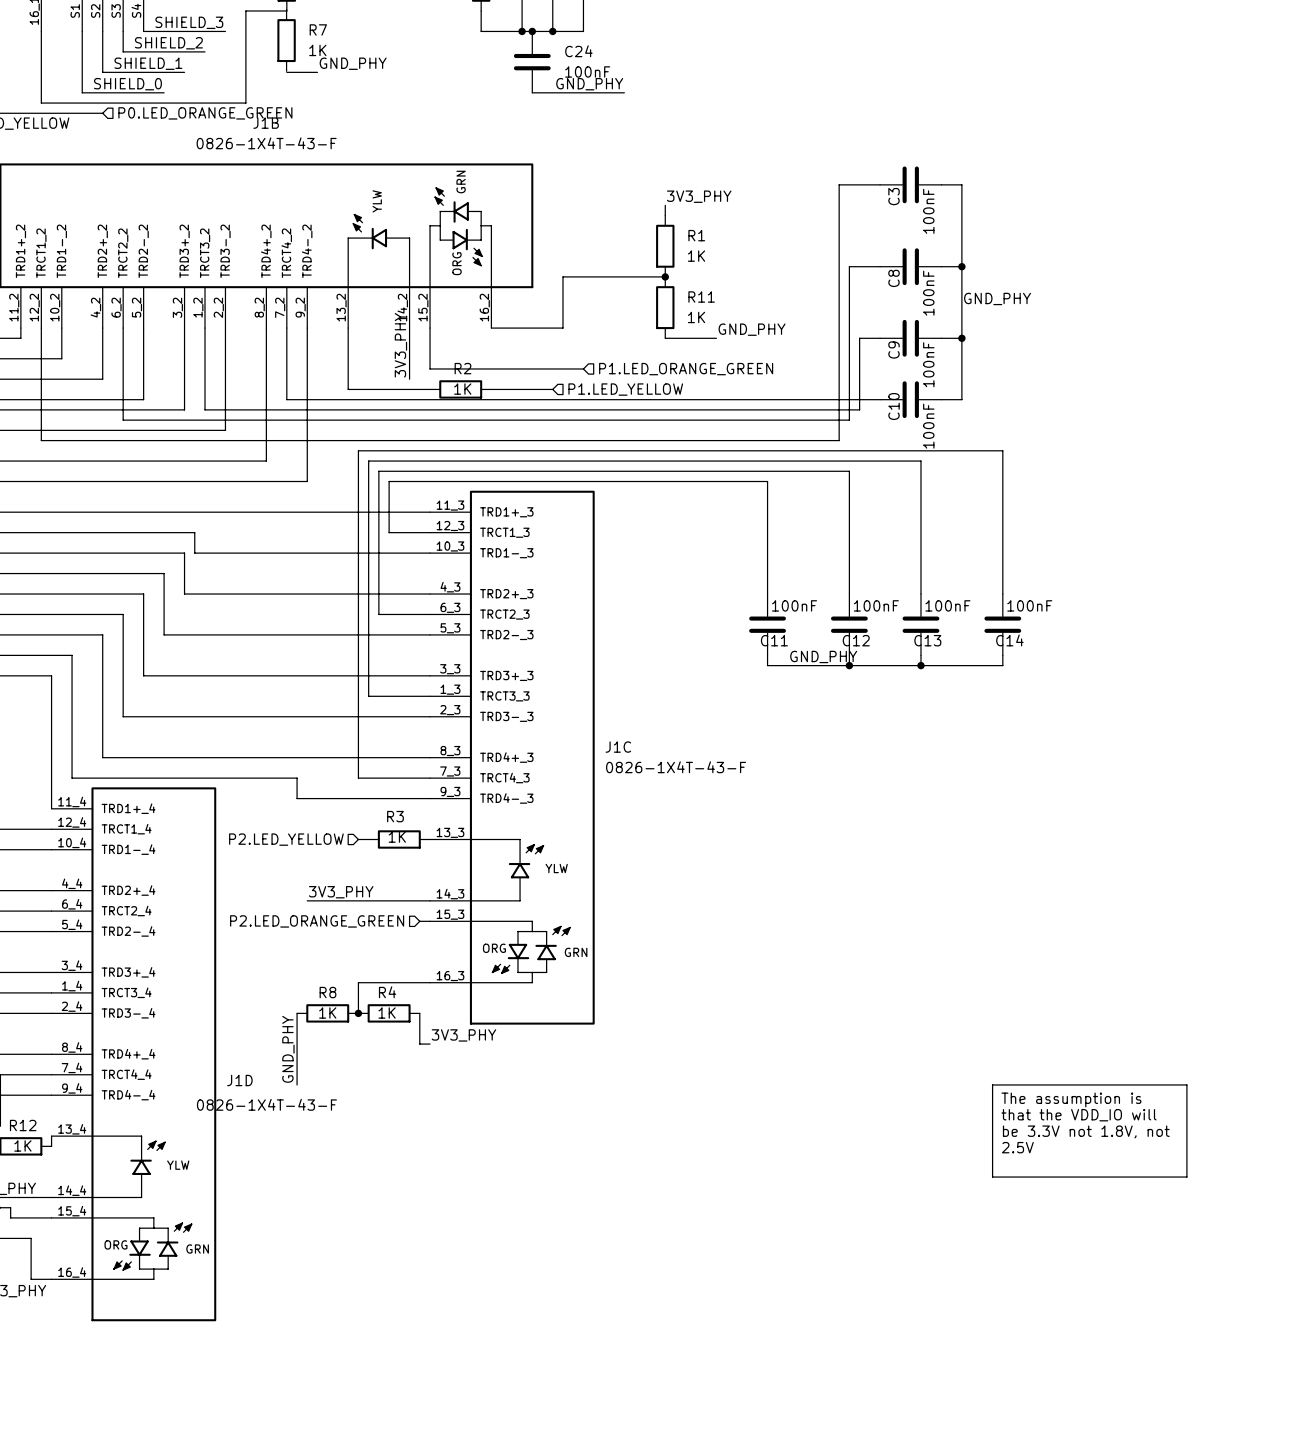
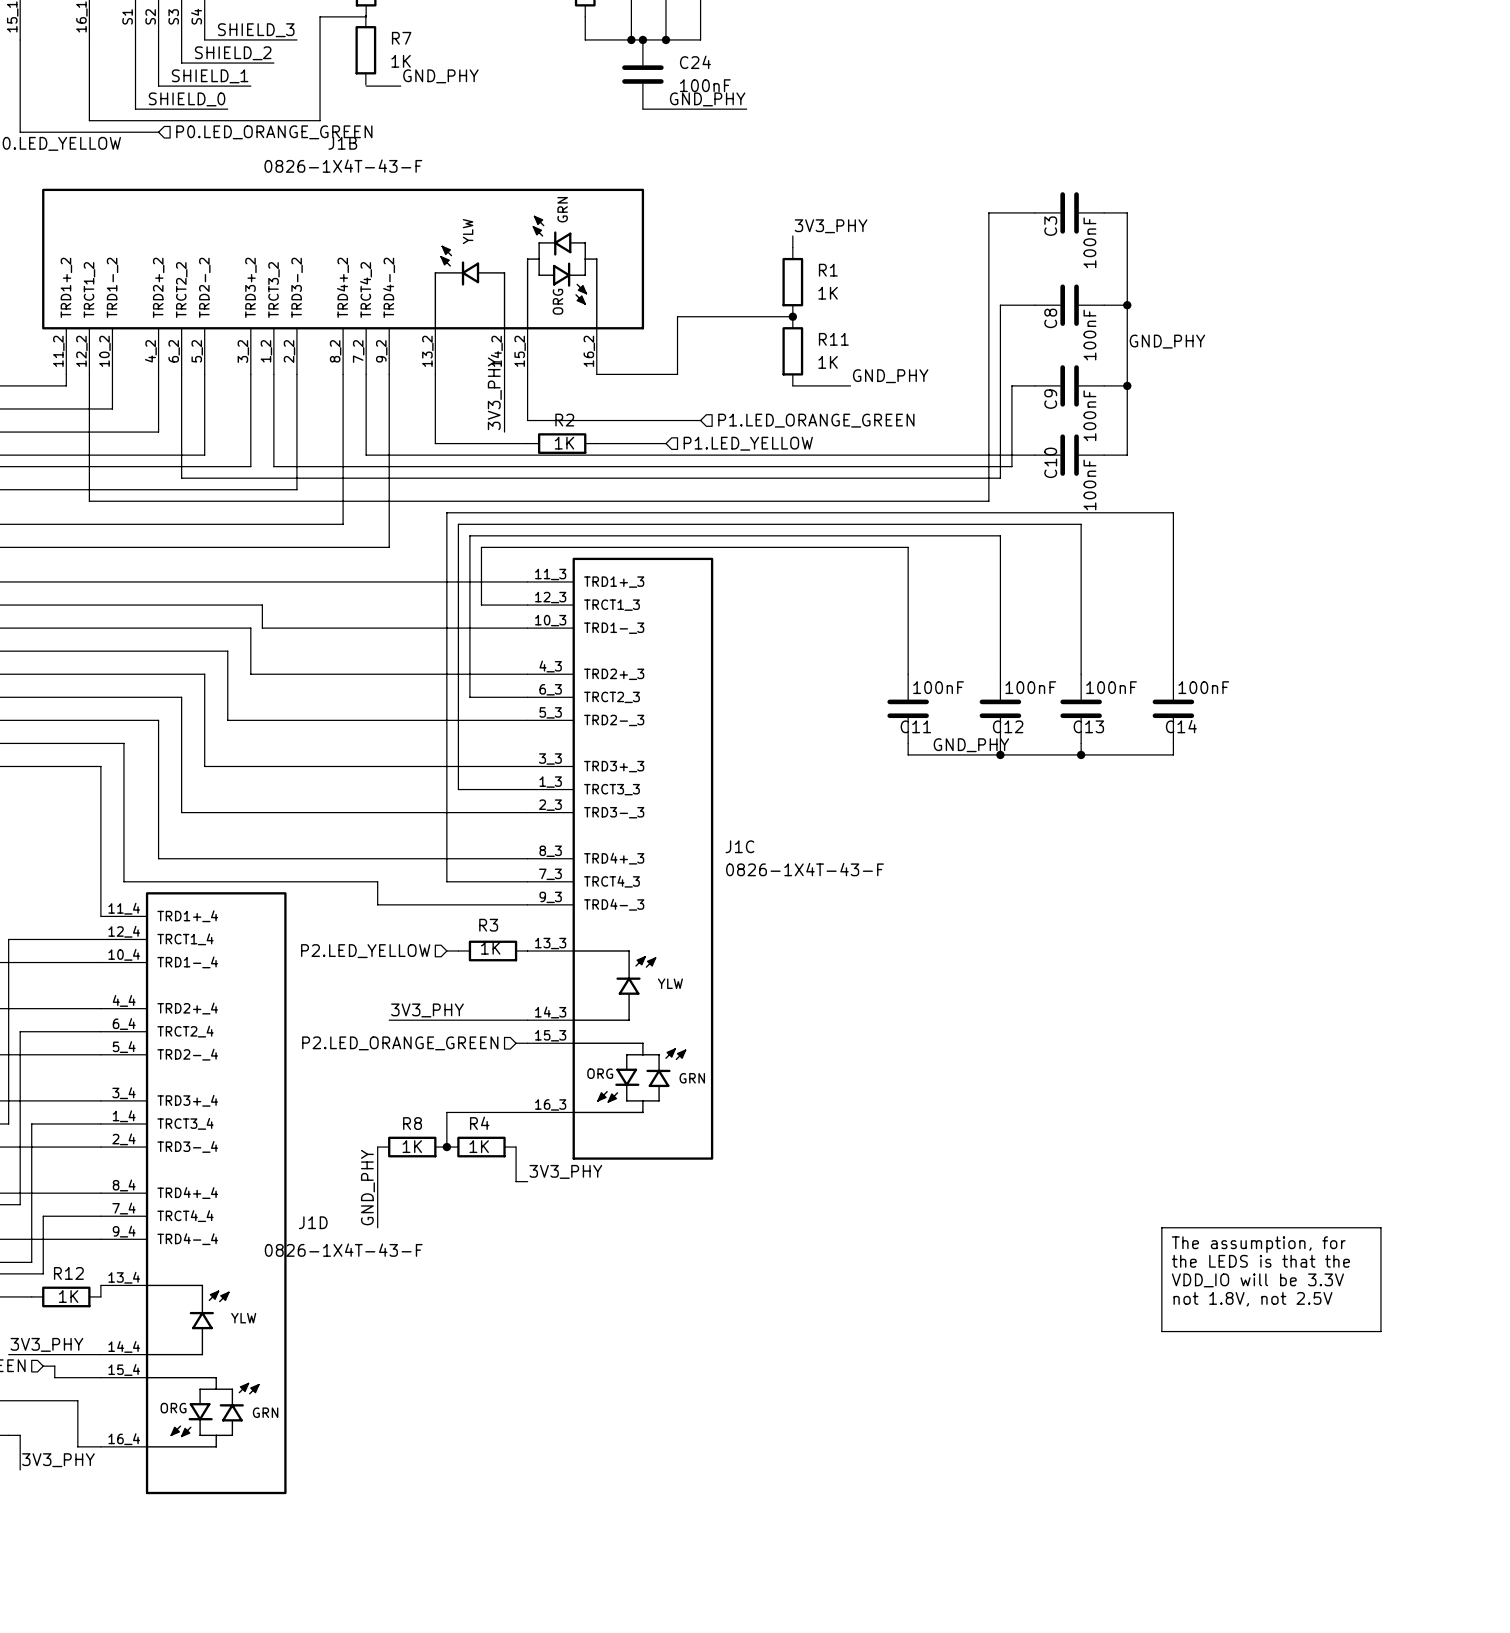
text: The assumption is (1071, 1099) -> The assumption, for (1258, 1244)
text: that the VDD_IO will (1079, 1115) -> the LEDS is that the (1260, 1261)
text: be 3.3V not 1.8V, not (1086, 1131) -> VDD_IO will be 3.3V (1257, 1280)
text: 2.5V (1017, 1147) -> not 1.8V, not 2.5V (1252, 1299)

